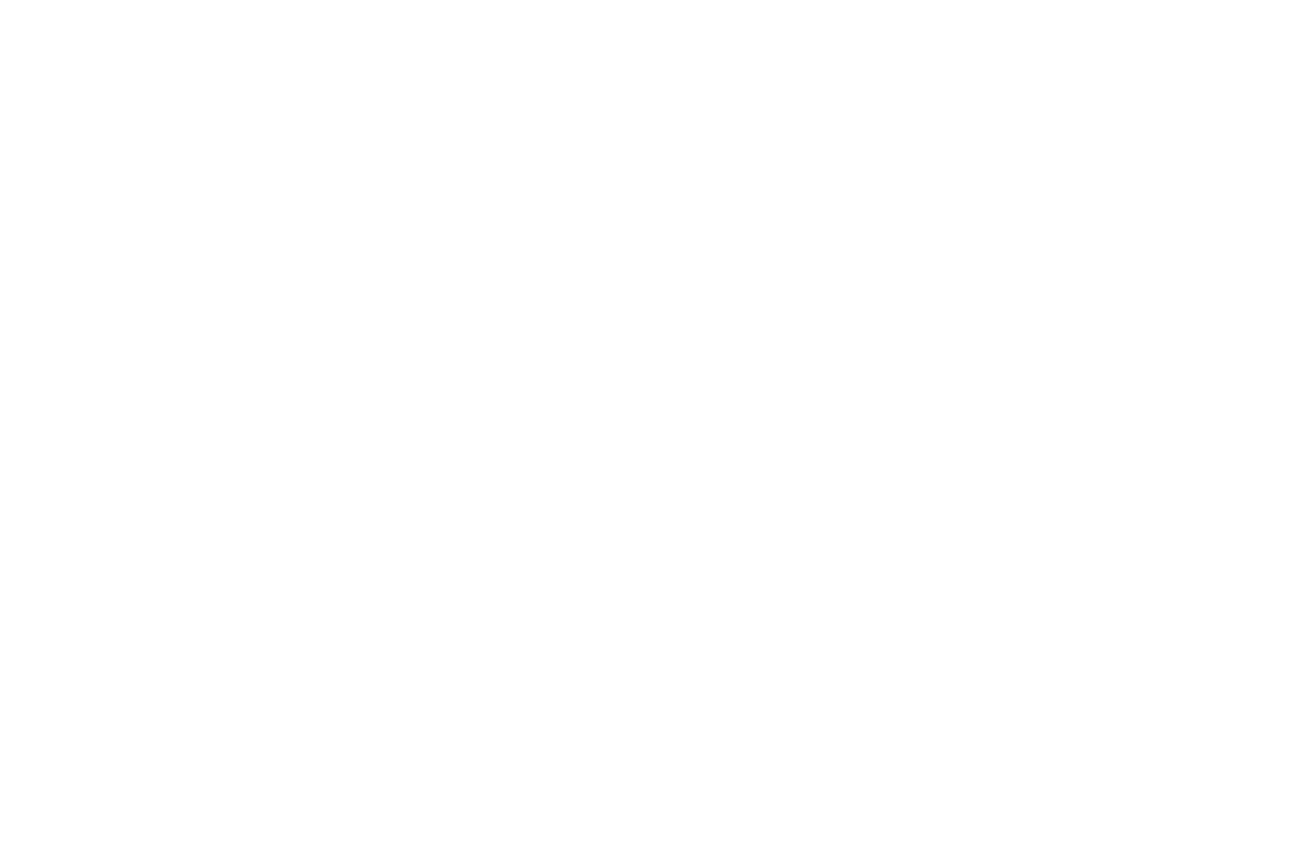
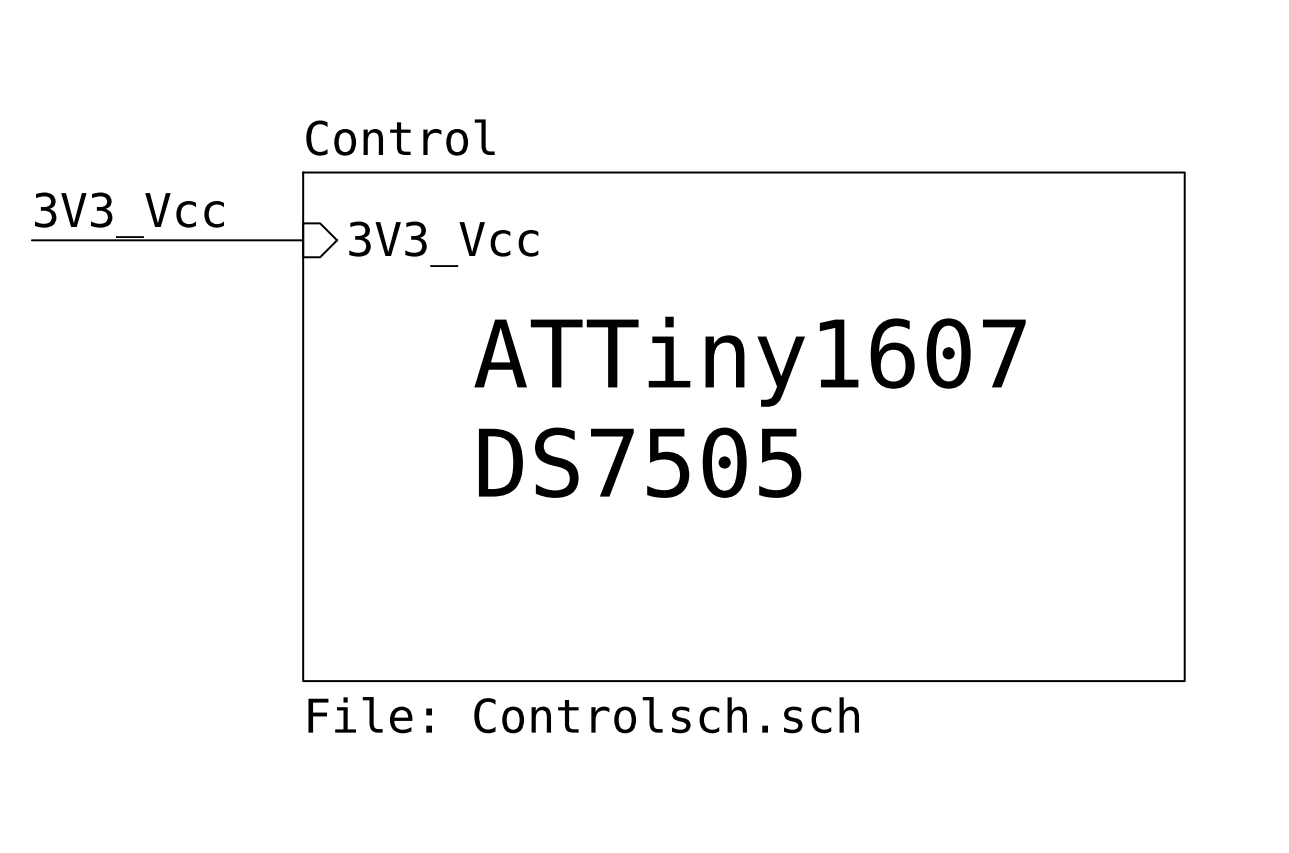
label: none -> 3V3_Vcc (129, 215)
wire: none -> (31, 240) (303, 240)
sheet pin: none -> 3V3_Vcc (443, 244)
text: none -> ATTiny1607 (750, 361)
sheet Control: none -> File: Controlsch.sch (743, 426)
text: none -> DS7505 (640, 462)

